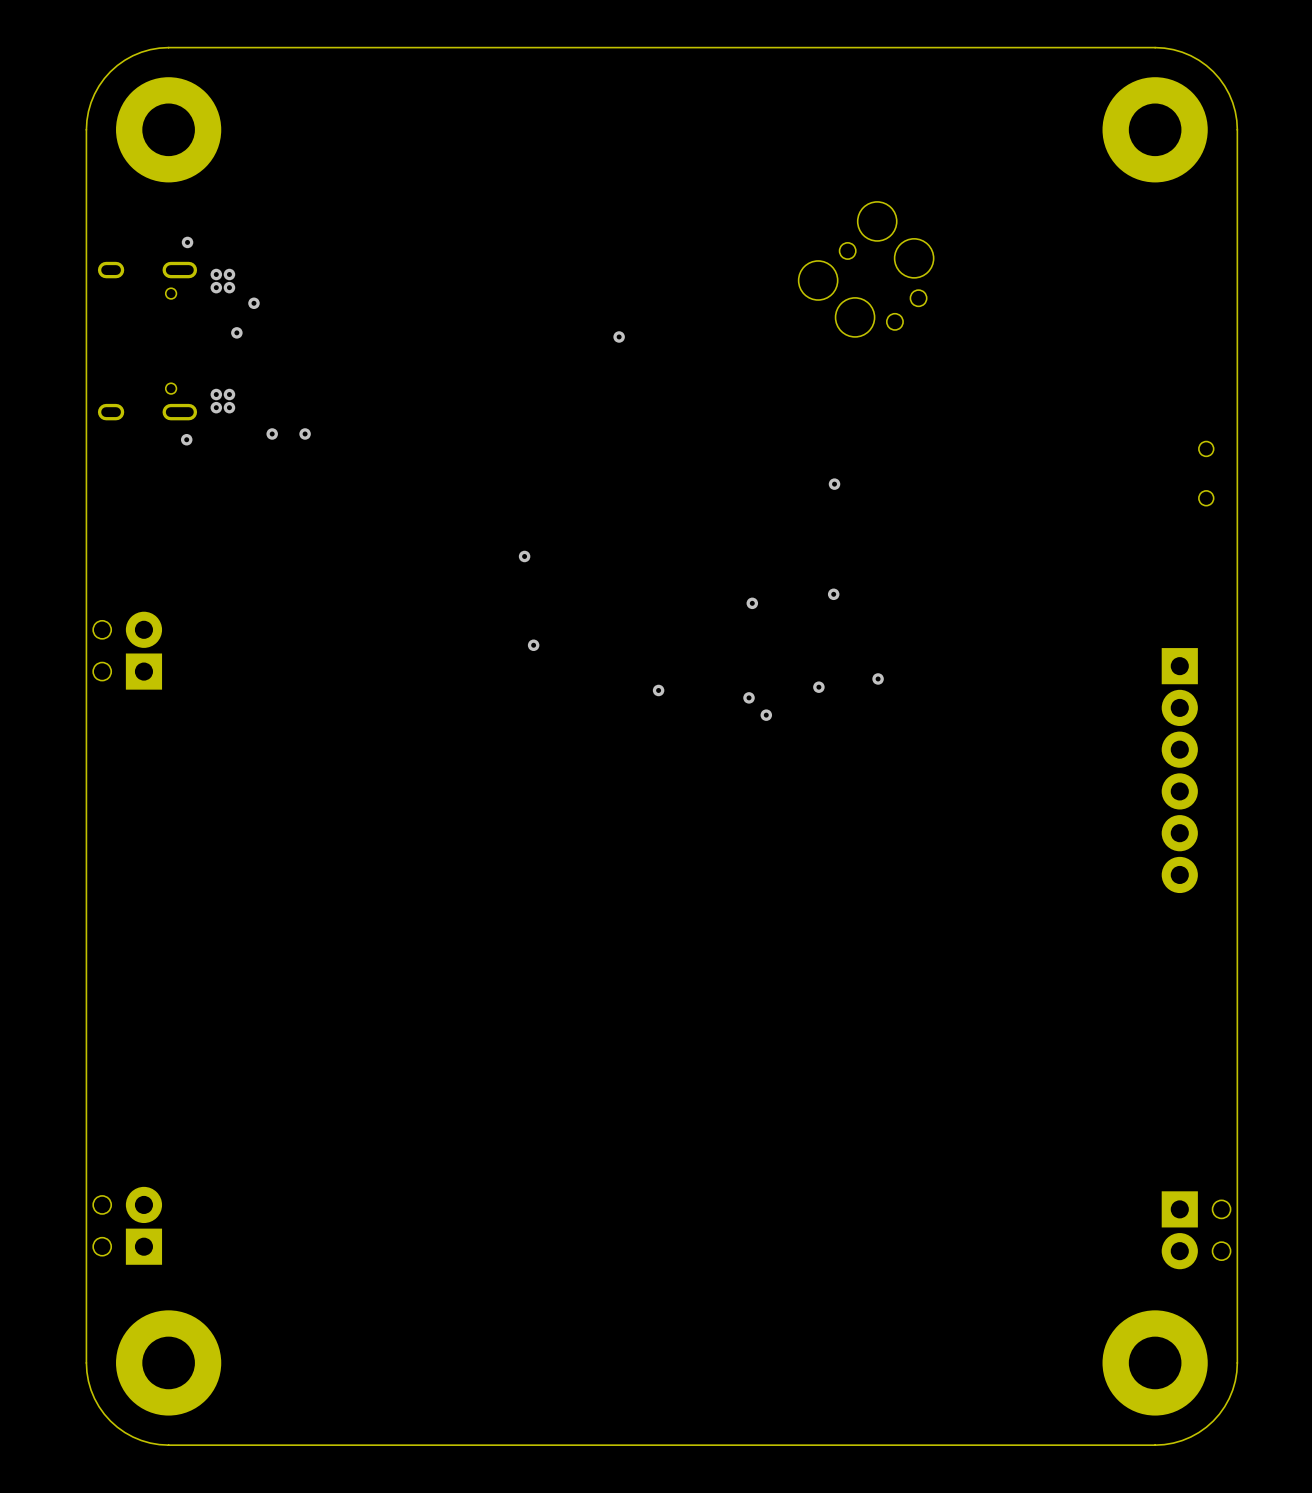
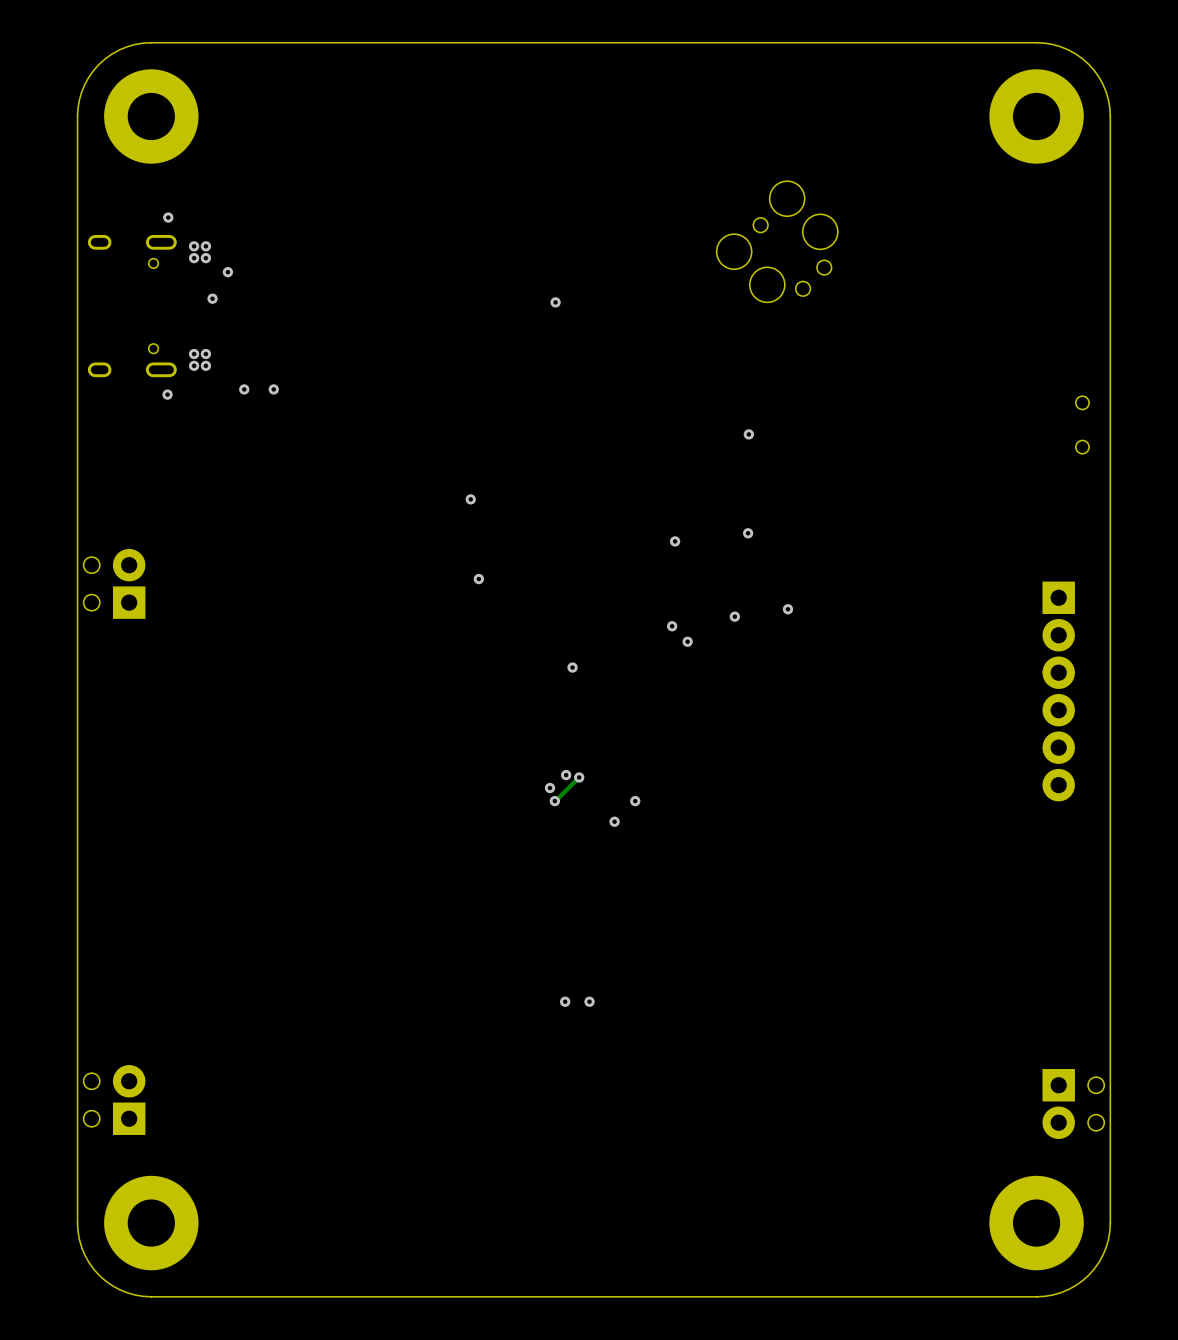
via position: (658, 690) -> (572, 667)
via: none -> (566, 775)
track: none -> (579, 777) (554, 801)
via: none -> (579, 777)
via: none -> (549, 788)
via: none -> (554, 801)
via: none -> (635, 801)
via: none -> (614, 821)
via: none -> (565, 1001)
via: none -> (589, 1001)

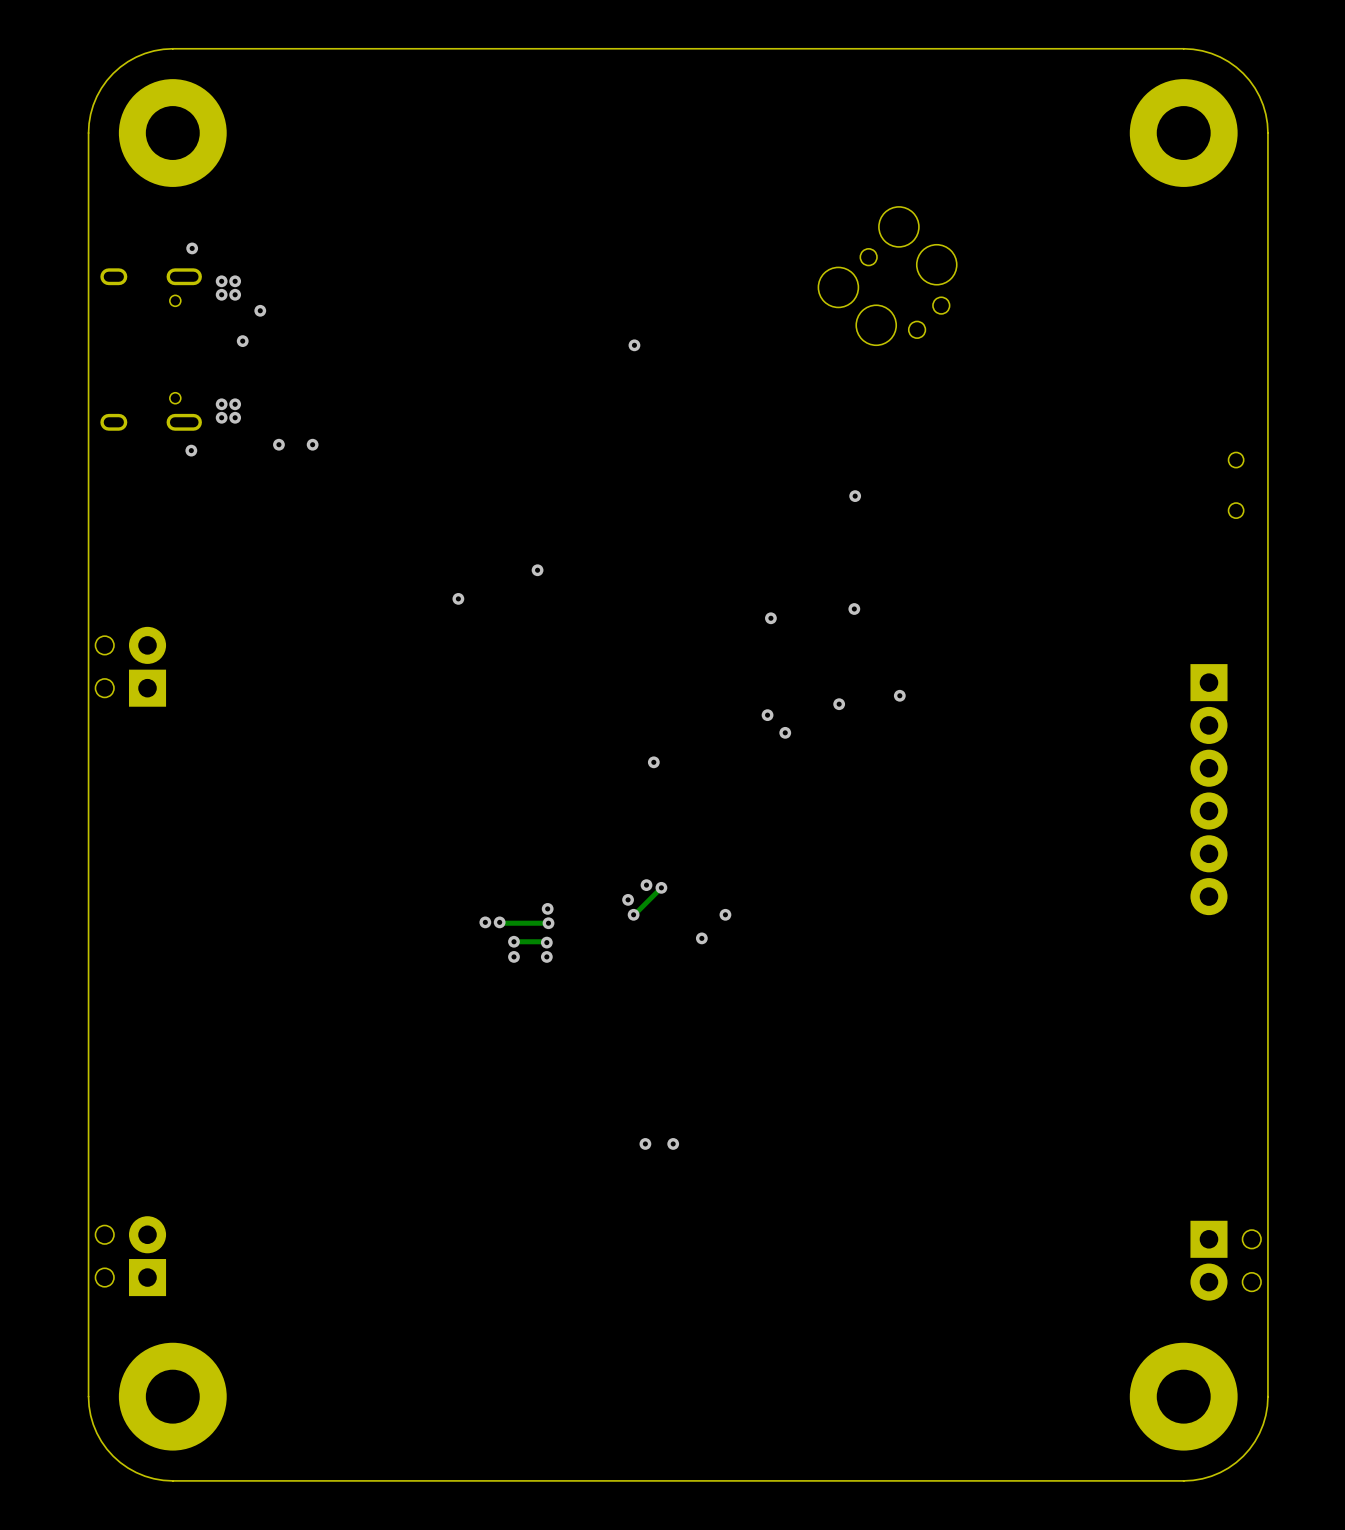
via: none -> (458, 598)
via: (478, 579) -> none
via: none -> (547, 908)
via: none -> (485, 922)
track: none -> (499, 922) (548, 923)
via: none -> (499, 922)
via: none -> (548, 923)
track: none -> (513, 941) (546, 942)
via: none -> (513, 941)
via: none -> (546, 942)
via: none -> (513, 956)
via: none -> (546, 956)

